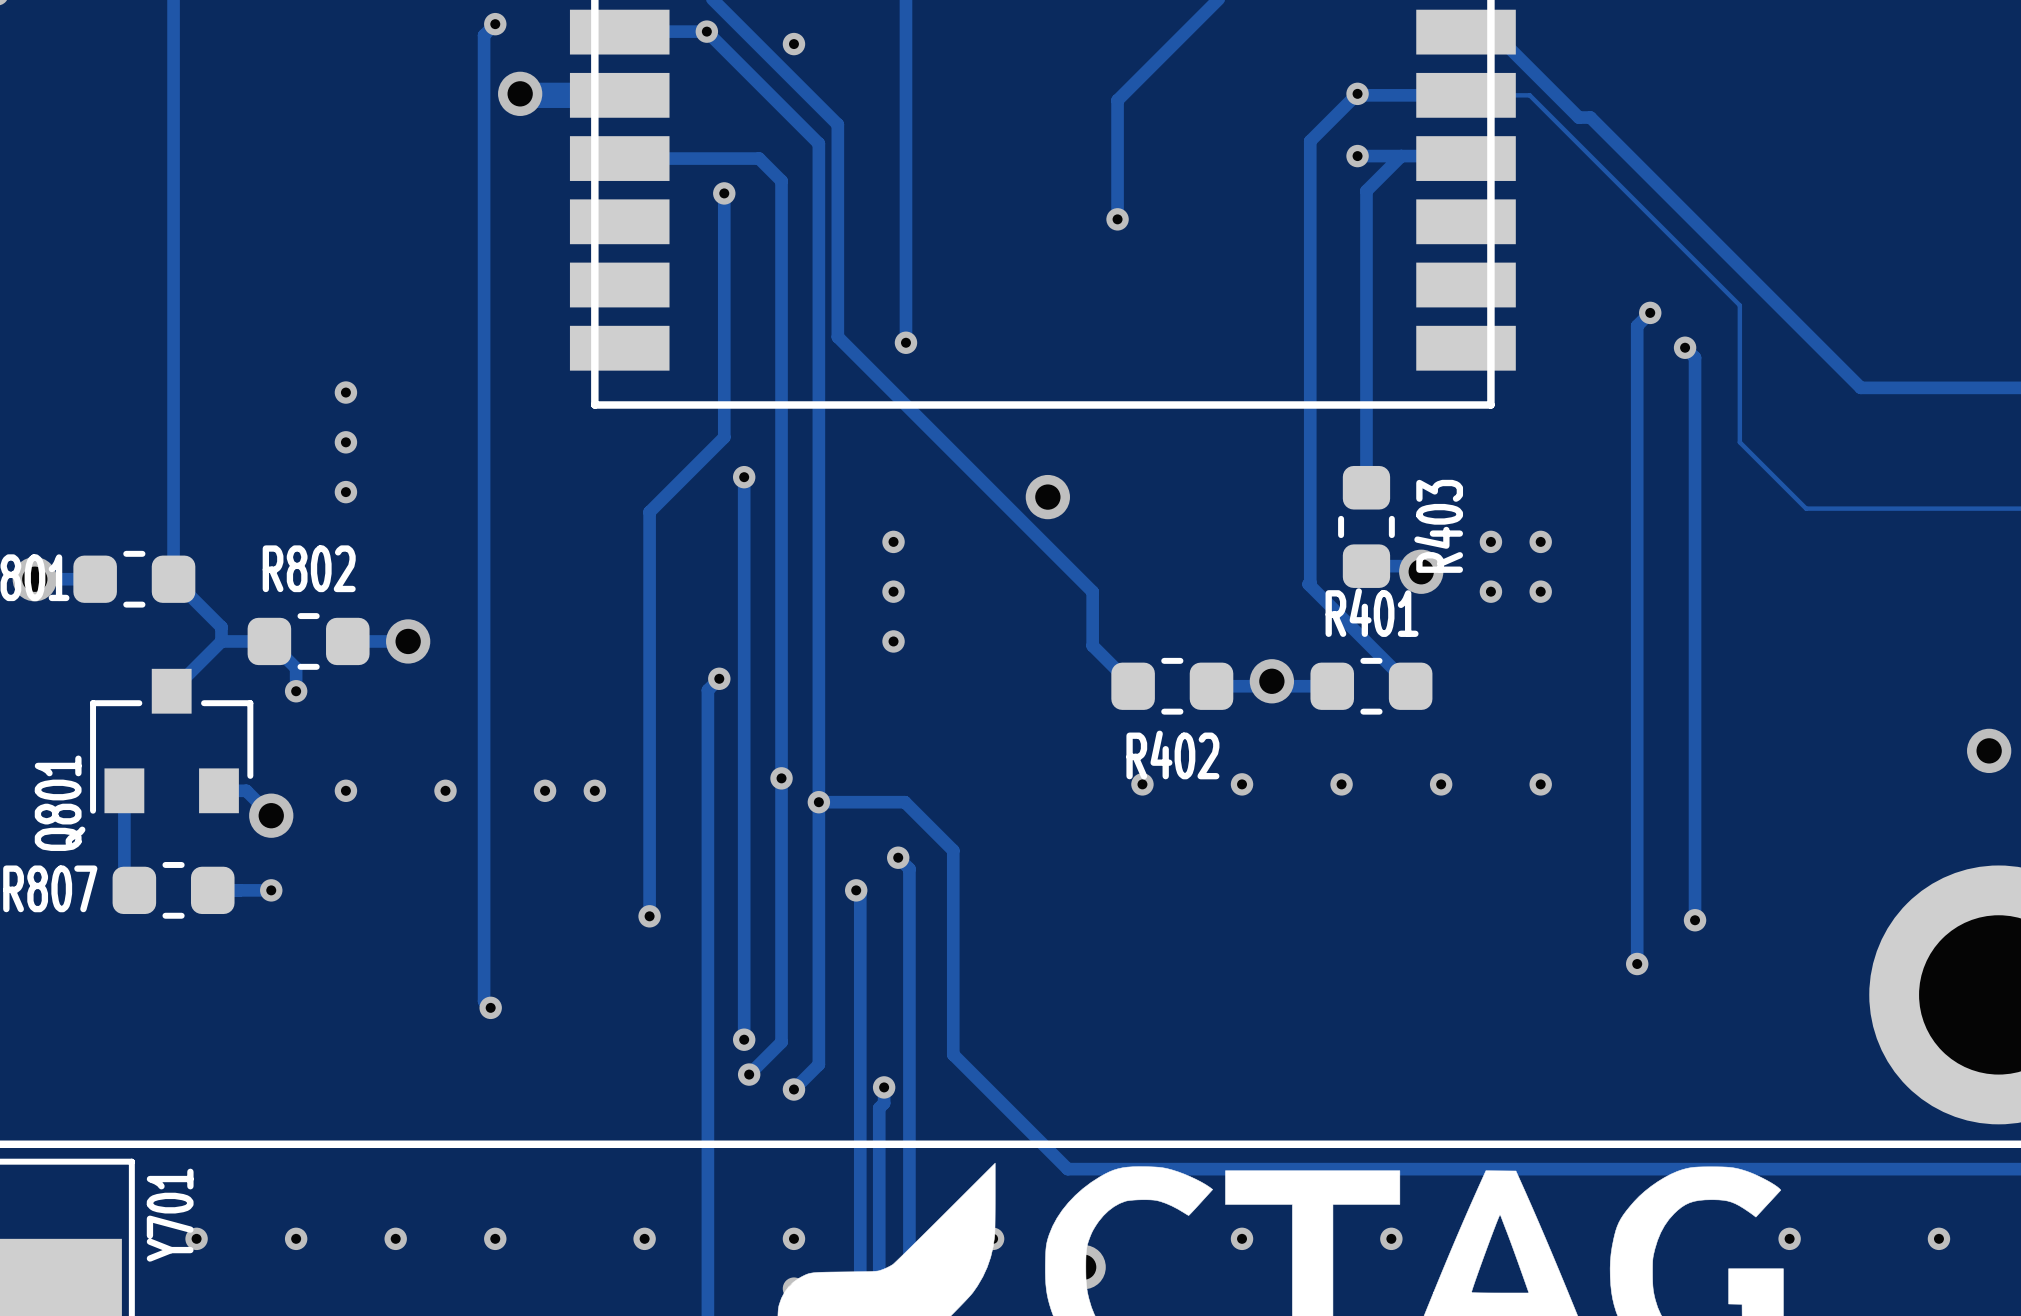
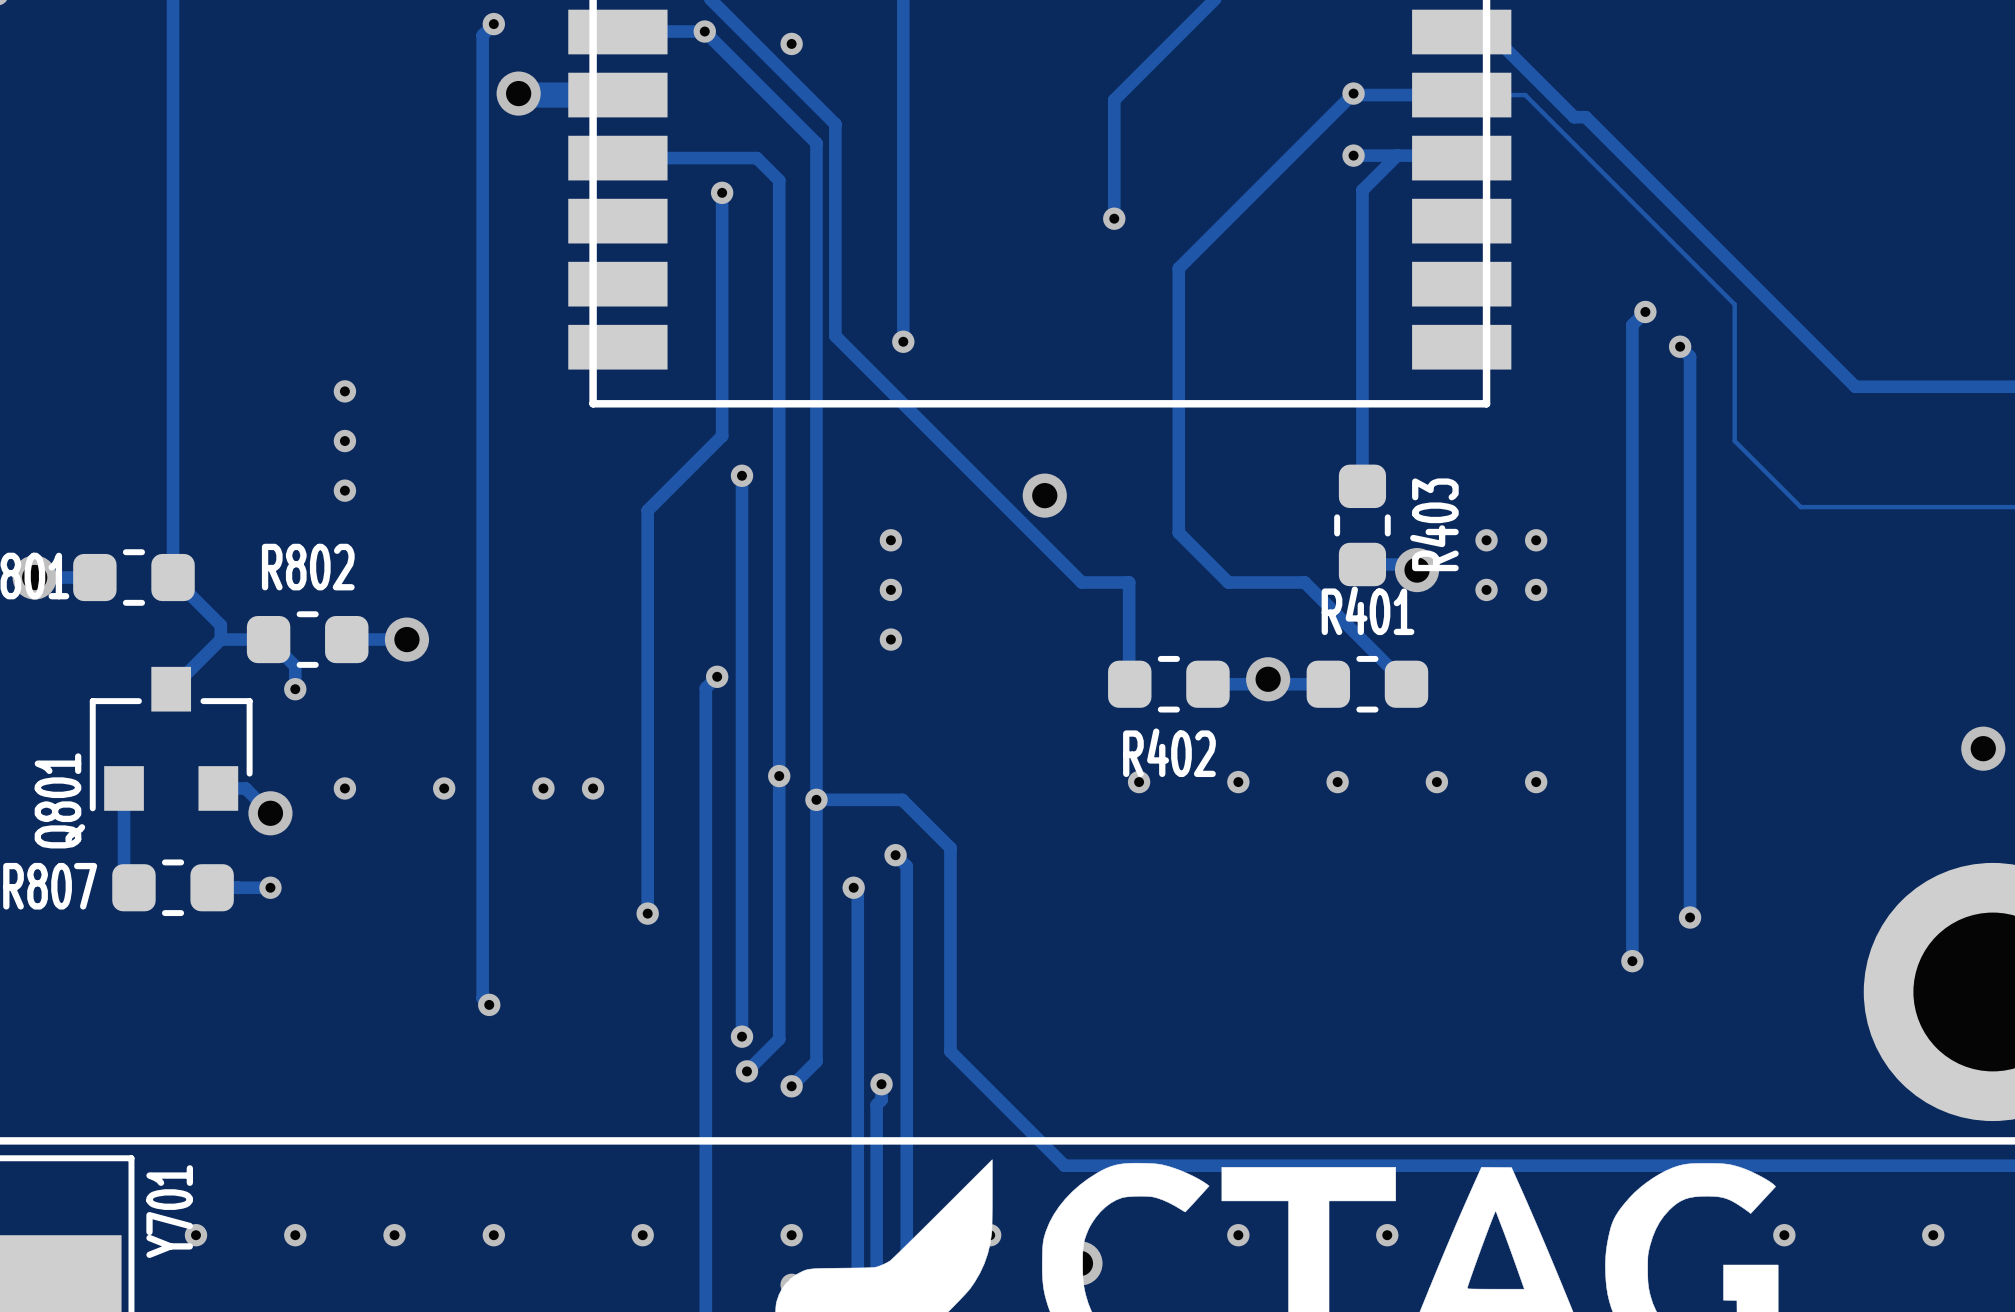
track: (1310, 141) (1310, 582) (1308, 584) -> (1306, 140) (1178, 268) (1178, 532) (1228, 582) (1304, 582)
track: (1085, 584) (1092, 591) (1092, 645) (1132, 685) -> (1081, 582) (1129, 582) (1129, 683)

